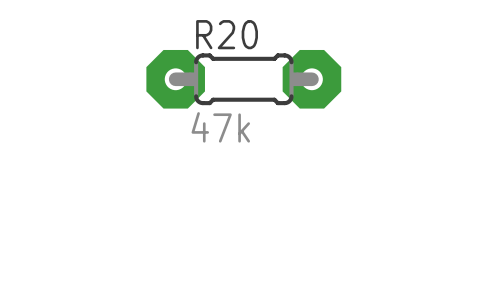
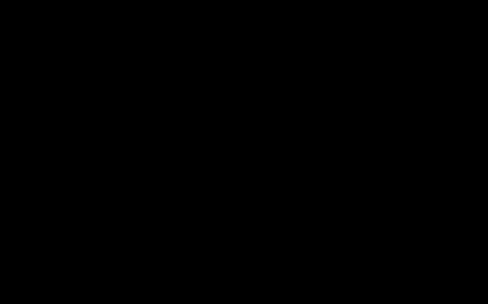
R20: 47k (243, 79) -> none

